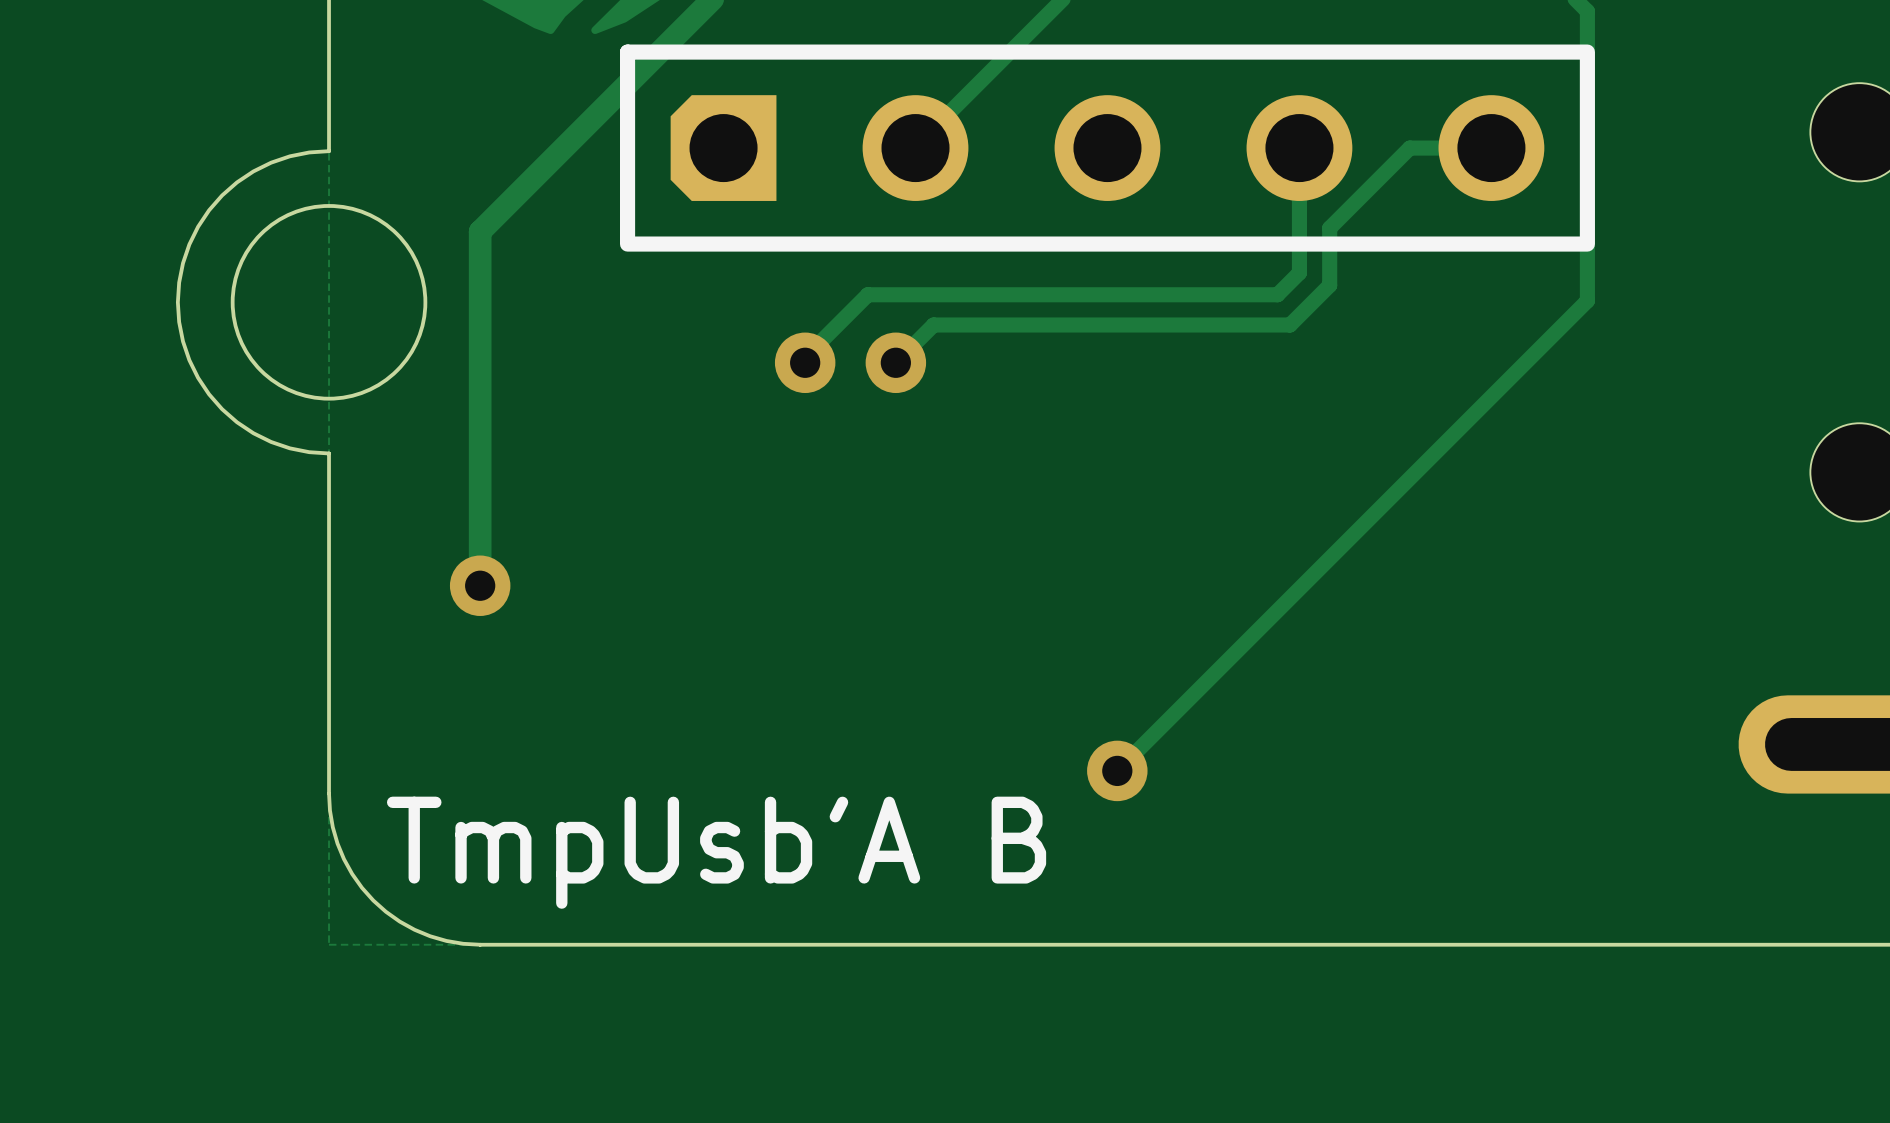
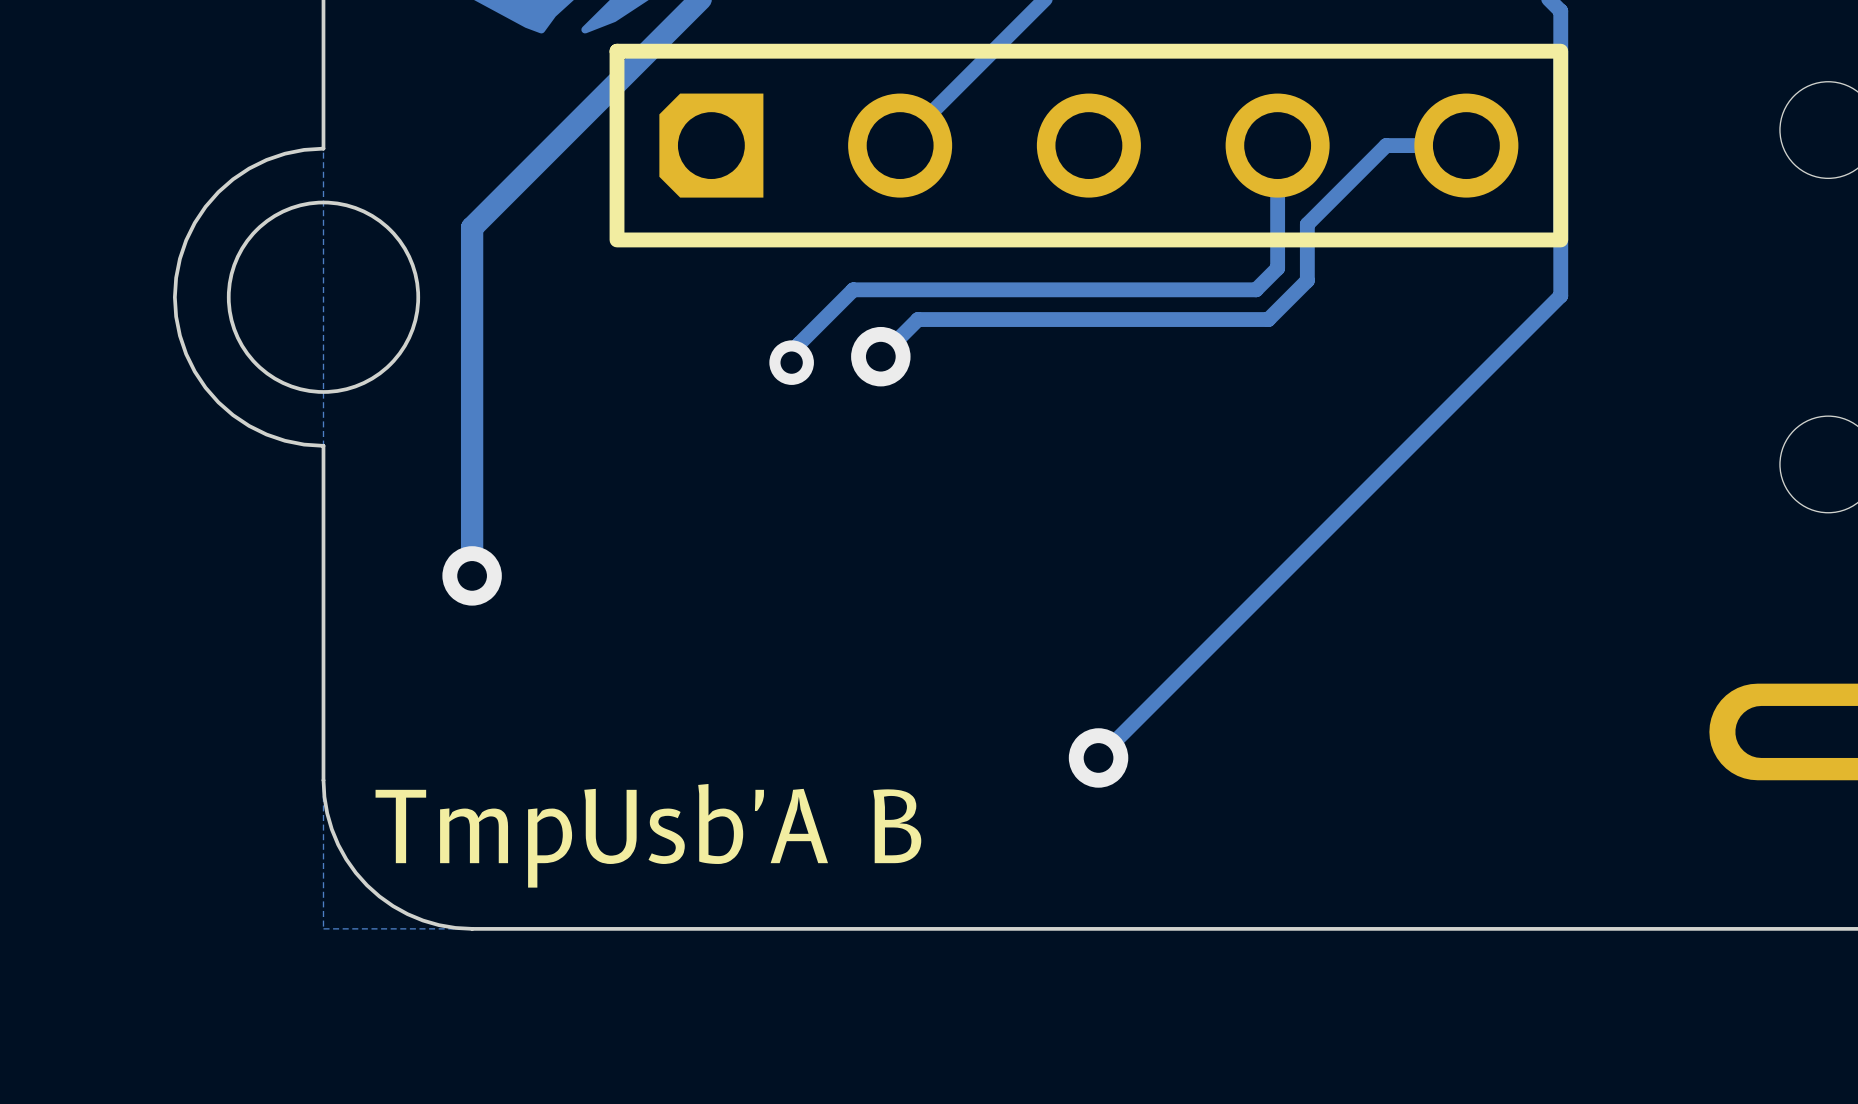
via size: [774, 332, 836, 394] -> [769, 340, 814, 385]

